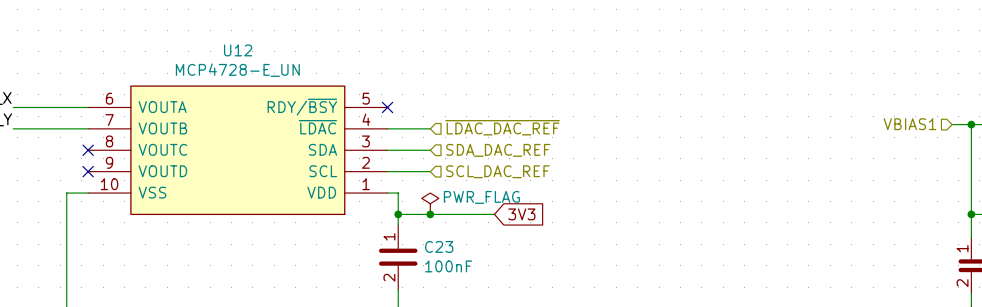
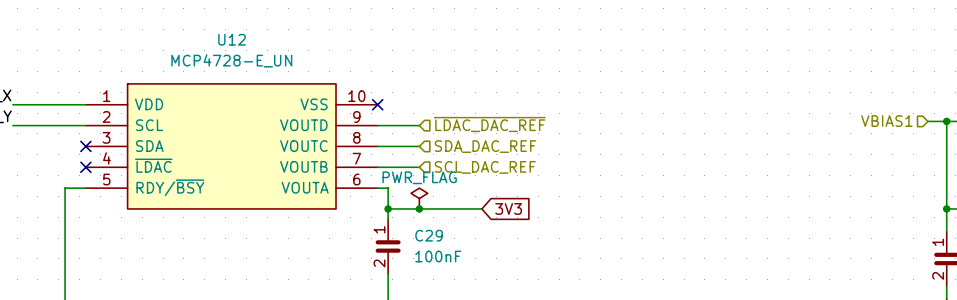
U12 rotation: 0° (237, 150) -> 180° (231, 146)
power symbol text position: PWR_FLAG (481, 197) -> PWR_FLAG (419, 177)
C29: none -> (388, 246)
C23: (398, 257) -> none

